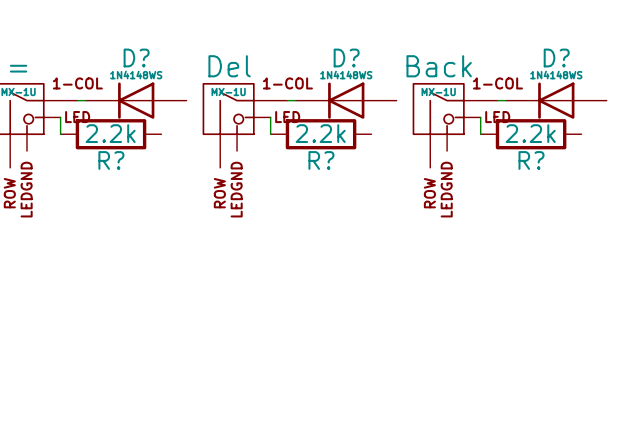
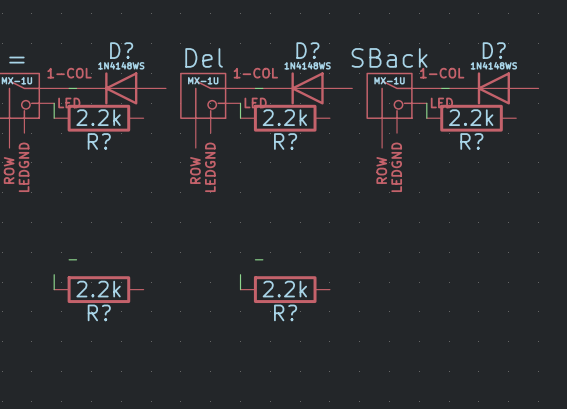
Back name: Back (439, 66) -> SBack (389, 57)
wire: none -> (69, 259) (76, 259)
wire: none -> (255, 259) (262, 259)
wire: none -> (54, 274) (54, 289)
wire: none -> (240, 274) (240, 289)
R?: none -> 2.2k (98, 289)
R?: none -> 2.2k (285, 289)

